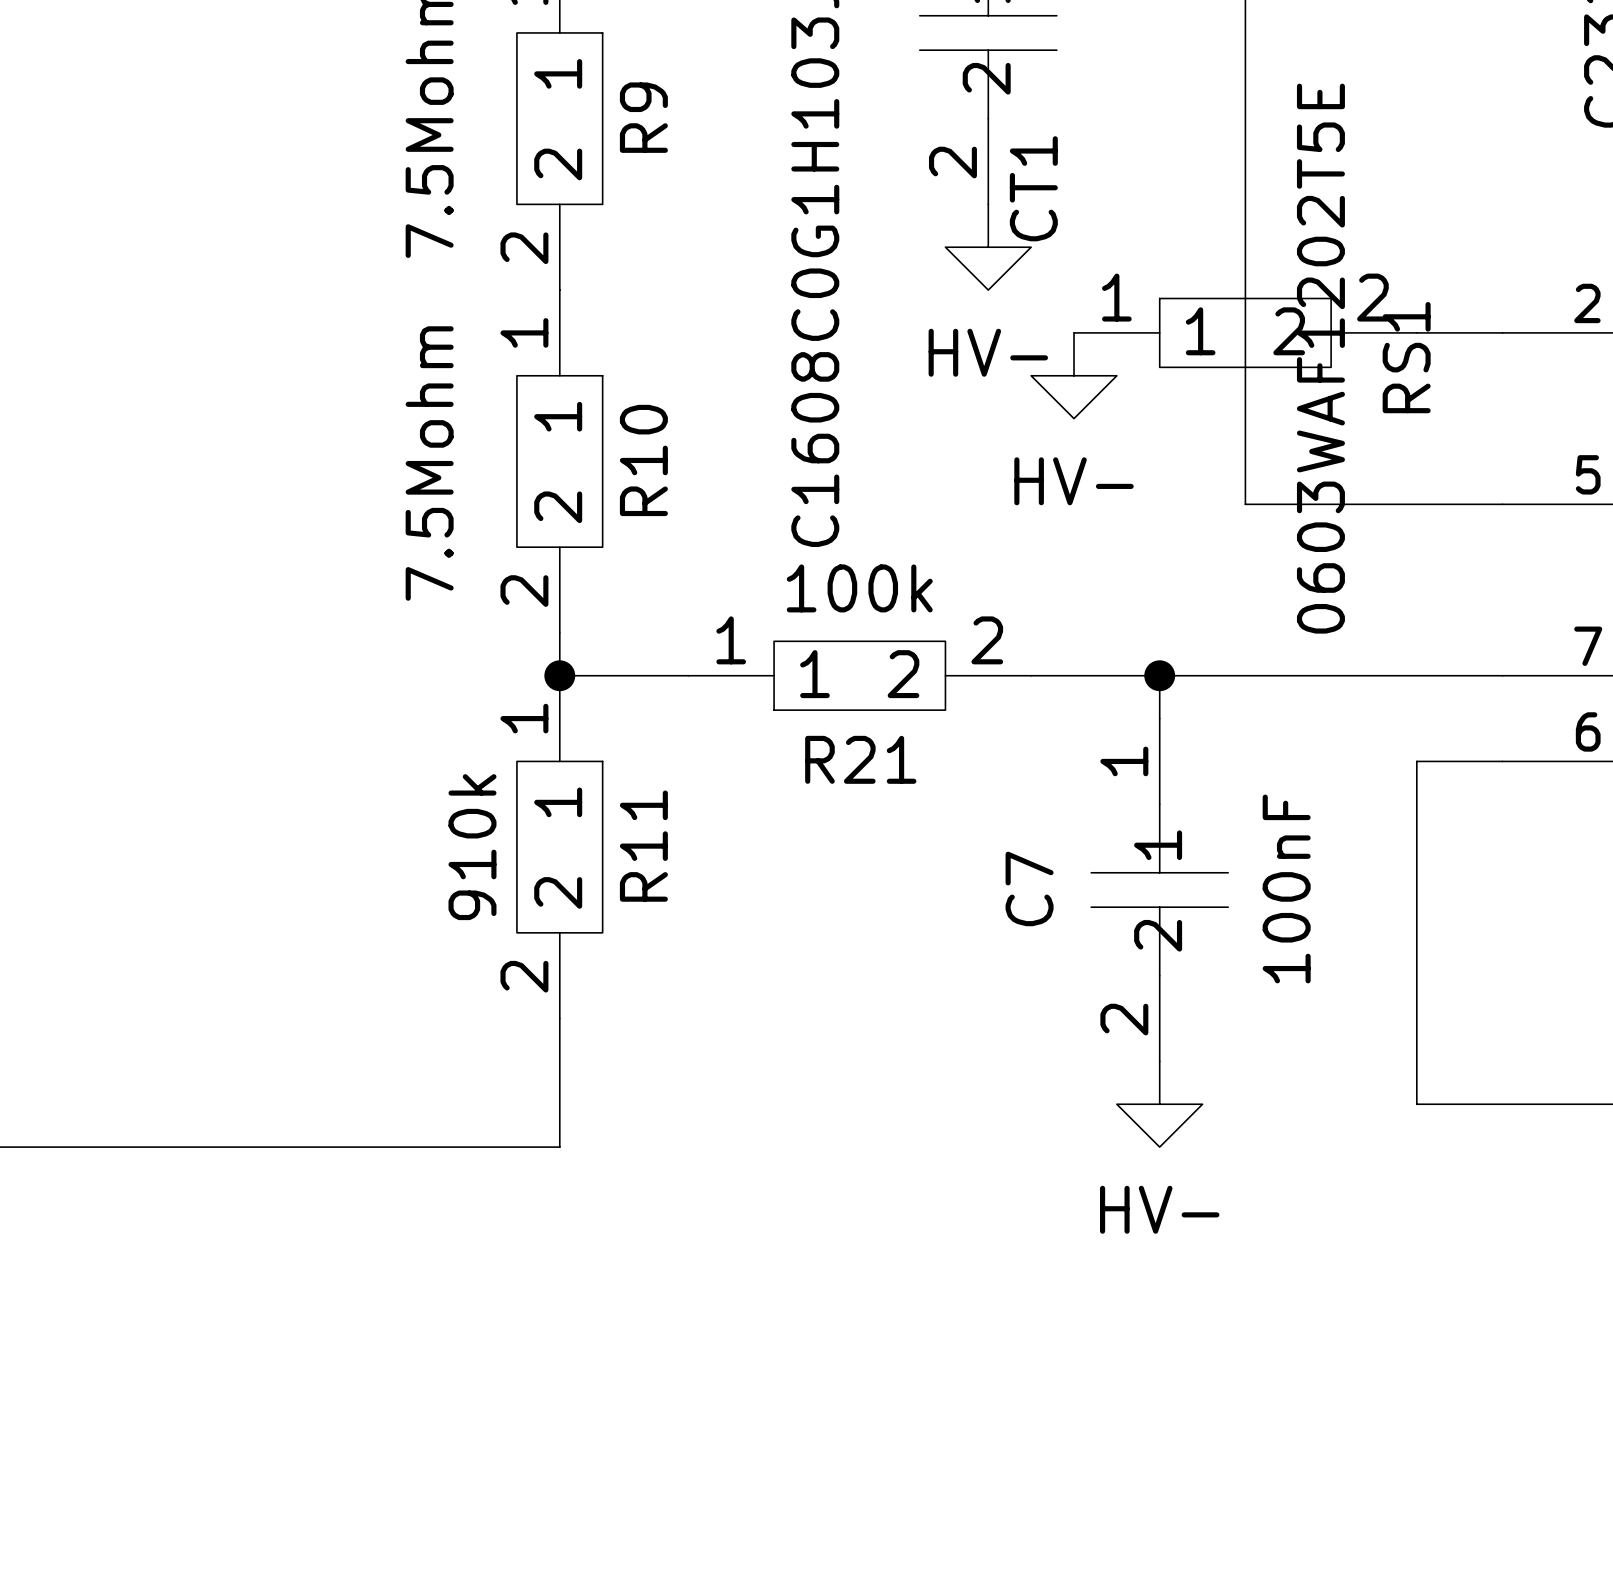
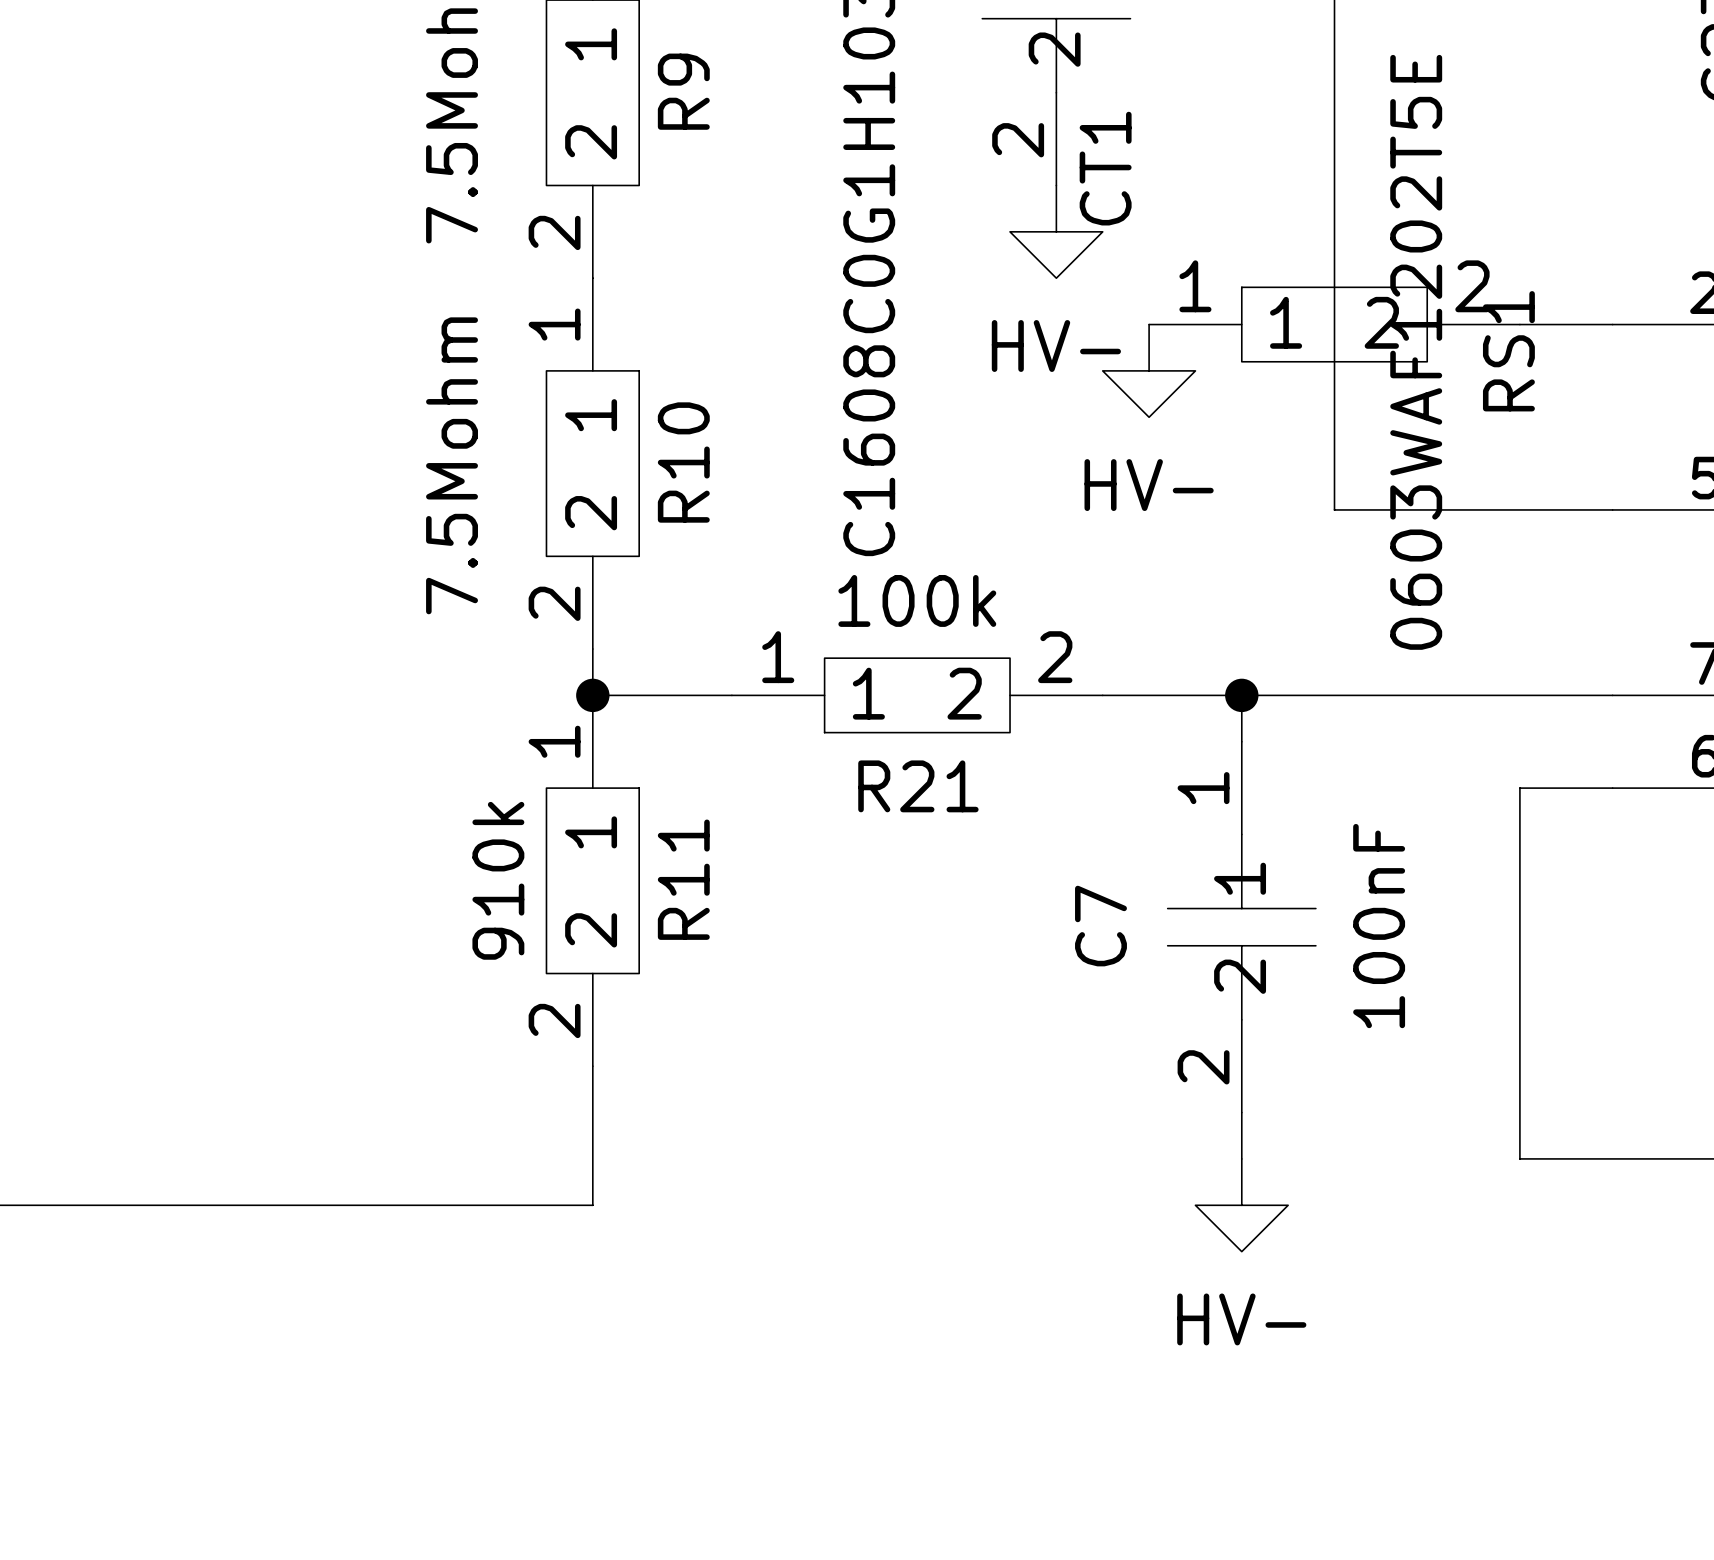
power symbol position: HV- (1159, 1104) -> HV- (1241, 1205)

